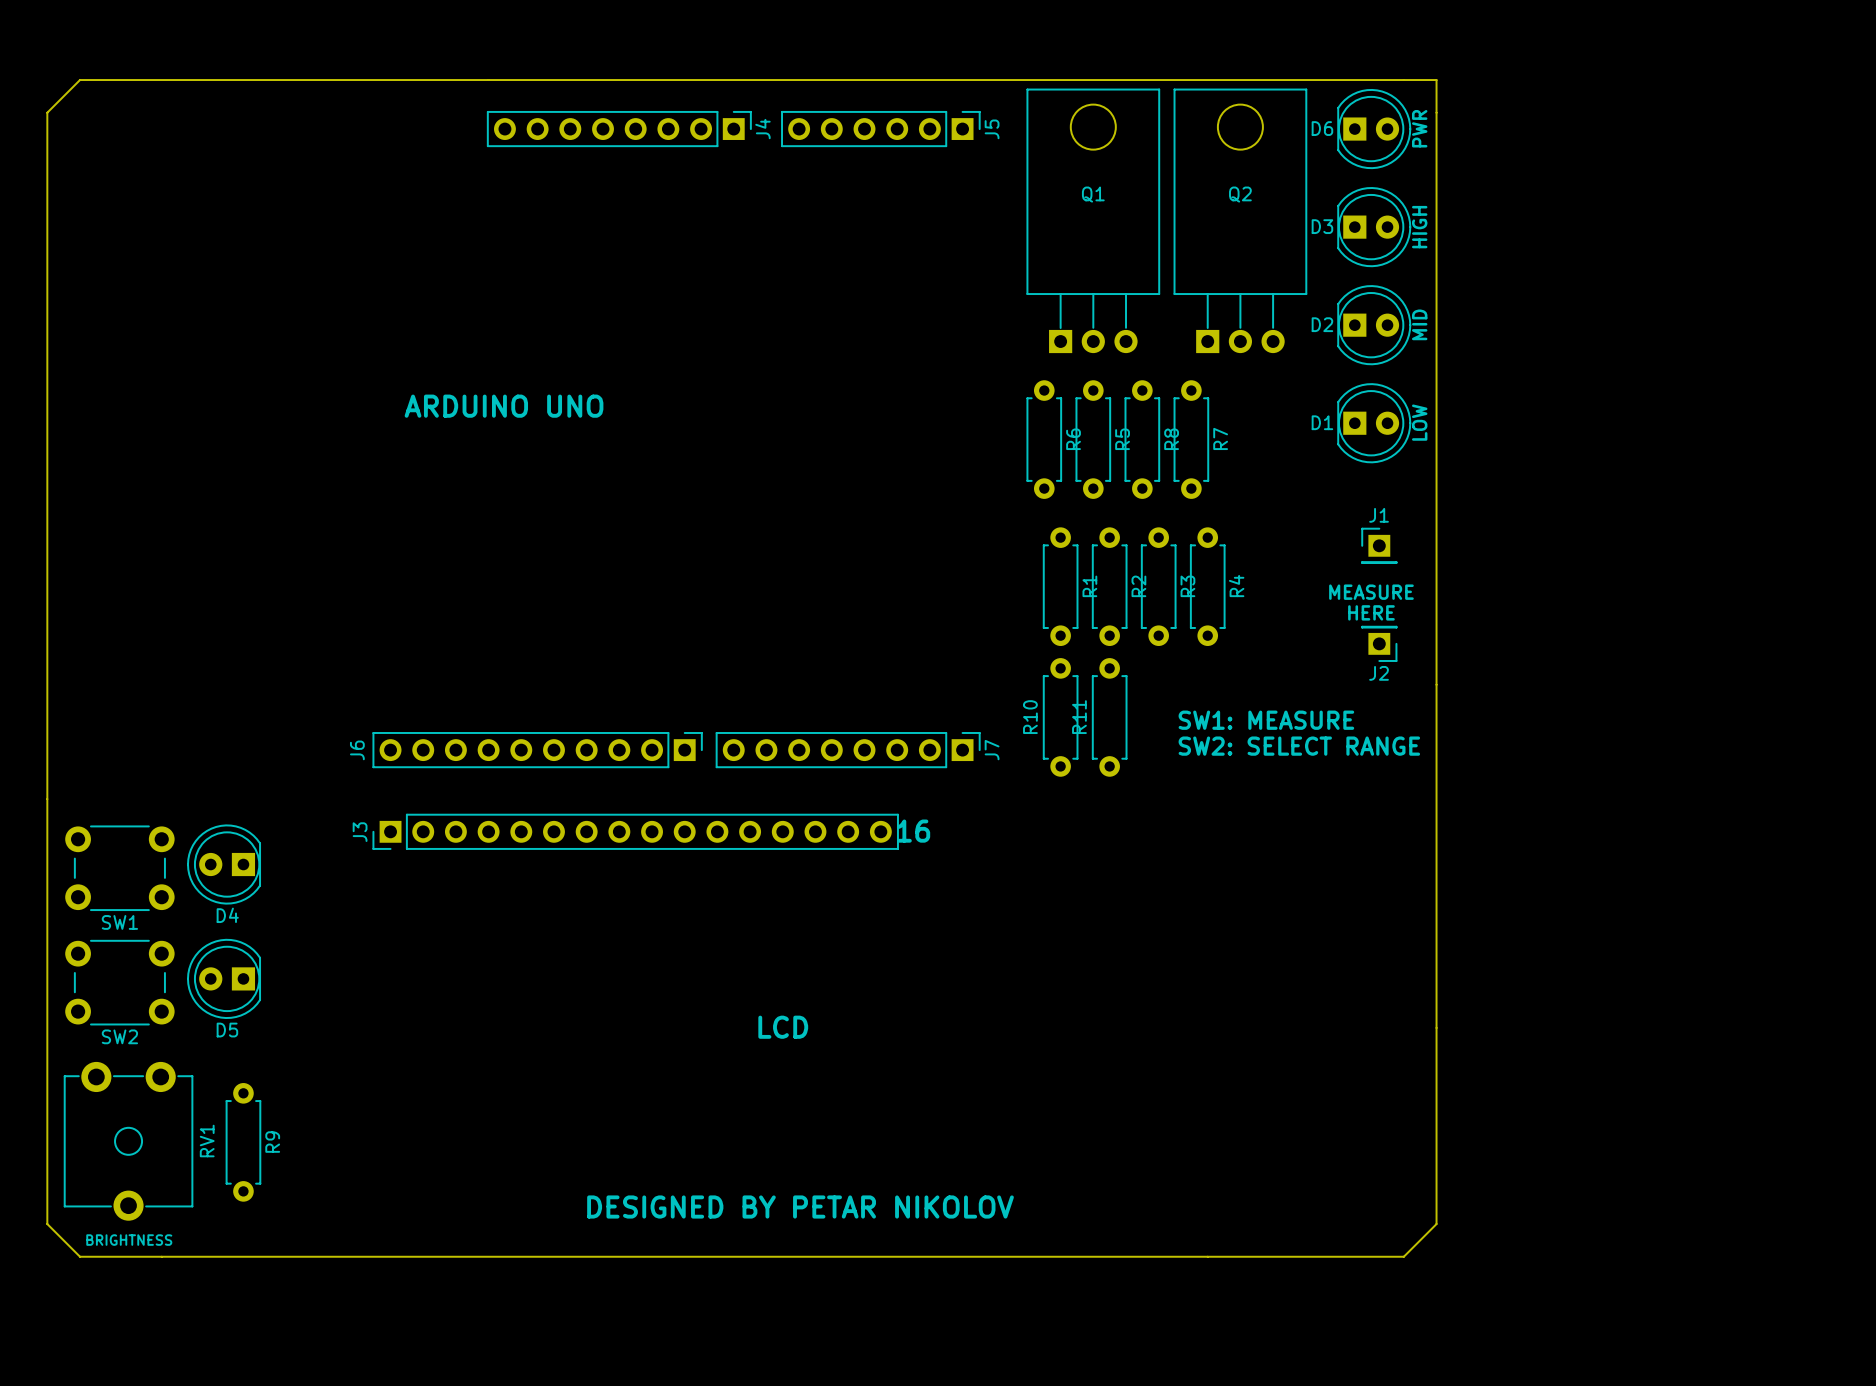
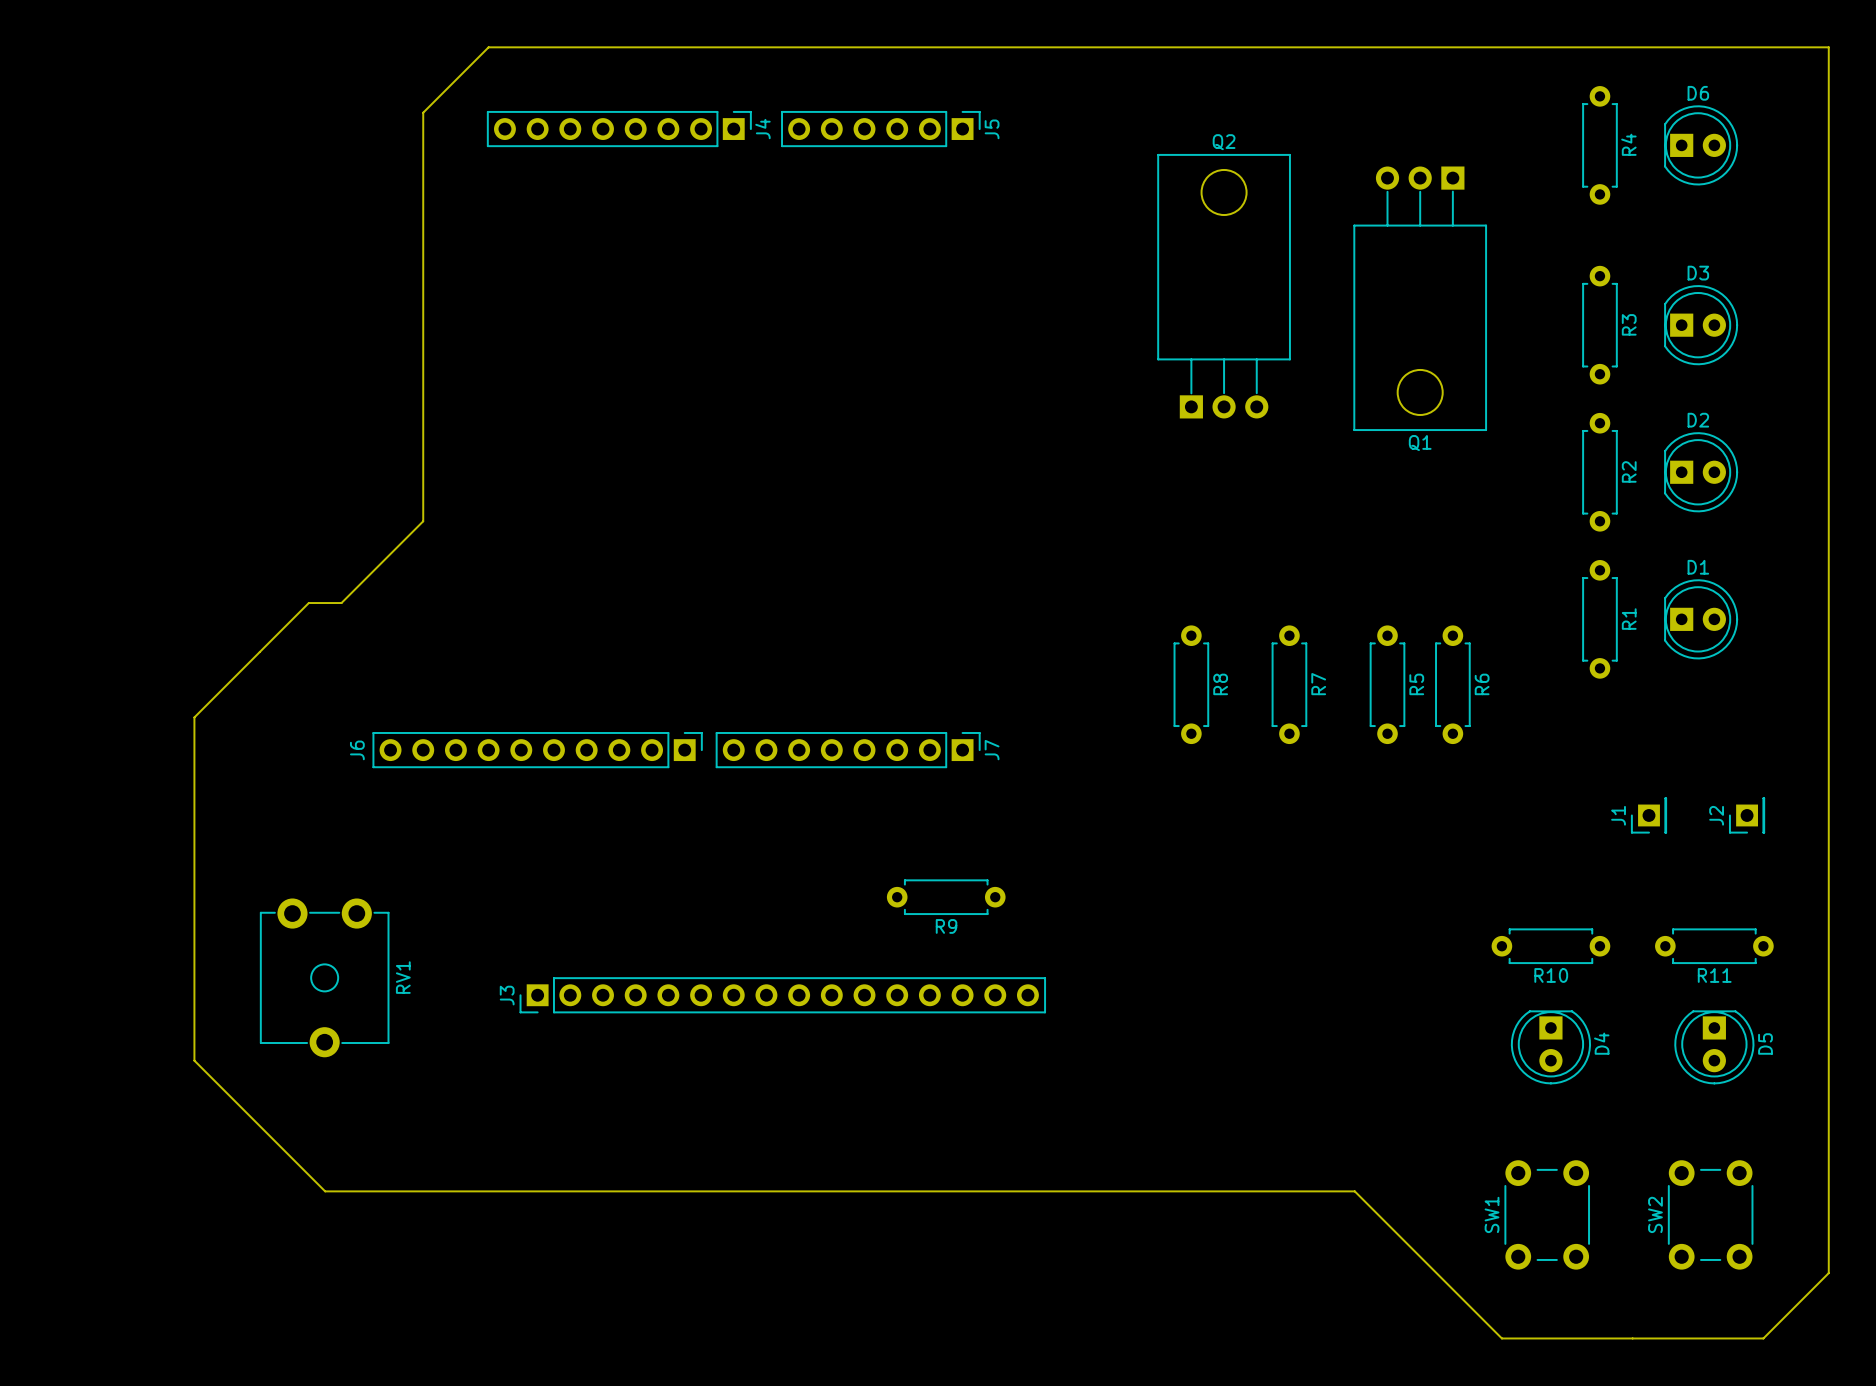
board edge: (80, 80) (1436, 80) (1436, 1224) (1403, 1256) (80, 1256) (47, 1224) (47, 112) (80, 80) -> (488, 47) (423, 112) (423, 521) (341, 603) (308, 603) (194, 717) (194, 1060) (325, 1191) (1354, 1191) (1501, 1338) (1763, 1338) (1828, 1273) (1828, 47) (488, 47)
D6 name position: D6 (1322, 128) -> D6 (1698, 93)
text: PWR (1419, 128) -> none
D6 position: (1374, 129) -> (1701, 145)
Q1 name position: Q1 (1093, 194) -> Q1 (1420, 443)
Q2 name position: Q2 (1240, 194) -> Q2 (1224, 142)
Q1 rotation: 0° (1093, 220) -> 180° (1420, 298)
Q1 position: (1093, 220) -> (1420, 298)
Q2 position: (1240, 220) -> (1224, 286)
D3 name position: D3 (1322, 226) -> D3 (1698, 273)
D3 position: (1374, 227) -> (1701, 325)
text: HIGH (1419, 227) -> none
D2 name position: D2 (1322, 324) -> D2 (1698, 420)
text: MID (1419, 324) -> none
D2 position: (1374, 325) -> (1701, 472)
text: ARDUINO UNO (504, 406) -> none
D1 name position: D1 (1322, 422) -> D1 (1698, 567)
text: LOW (1419, 422) -> none
D1 position: (1374, 423) -> (1701, 619)
R6 position: (1044, 439) -> (1452, 684)
R5 position: (1093, 439) -> (1387, 684)
R8 position: (1142, 439) -> (1191, 684)
R7 position: (1191, 439) -> (1289, 684)
J1 rotation: 0° (1379, 545) -> 90° counterclockwise (1649, 815)
J1 position: (1379, 545) -> (1649, 815)
R1 position: (1060, 586) -> (1599, 619)
R2 position: (1109, 586) -> (1599, 472)
R3 position: (1158, 586) -> (1599, 325)
R4 position: (1207, 586) -> (1599, 145)
text: MEASURE (1371, 592) -> none
text: HERE (1371, 612) -> none
J2 rotation: 0° (1379, 643) -> 90° clockwise (1747, 815)
J2 position: (1379, 643) -> (1747, 815)
R10 name position: R10 (1030, 717) -> R10 (1551, 975)
R10 rotation: 0° (1060, 717) -> 90° clockwise (1550, 946)
R10 position: (1060, 717) -> (1550, 946)
R11 name position: R11 (1079, 717) -> R11 (1714, 975)
R11 rotation: 0° (1109, 717) -> 90° clockwise (1714, 946)
R11 position: (1109, 717) -> (1714, 946)
text: SW1: MEASURE (1266, 720) -> none
text: SW2: SELECT RANGE (1299, 746) -> none
J3 position: (635, 831) -> (782, 995)
text: 16 (913, 831) -> none
D4 rotation: 0° (224, 864) -> 90° counterclockwise (1550, 1047)
D4 position: (224, 864) -> (1550, 1047)
SW1 rotation: 0° (119, 868) -> 90° clockwise (1547, 1214)
SW1 position: (119, 868) -> (1547, 1214)
D5 rotation: 0° (224, 978) -> 90° counterclockwise (1714, 1047)
D5 position: (224, 978) -> (1714, 1047)
SW2 rotation: 0° (119, 982) -> 90° clockwise (1710, 1214)
SW2 position: (119, 982) -> (1710, 1214)
text: LCD (783, 1027) -> none
RV1 position: (128, 1141) -> (324, 977)
R9 rotation: 0° (243, 1142) -> 90° clockwise (946, 897)
R9 position: (243, 1142) -> (946, 897)
text: DESIGNED BY PETAR NIKOLOV (800, 1207) -> none
text: BRIGHTNESS (129, 1240) -> none

